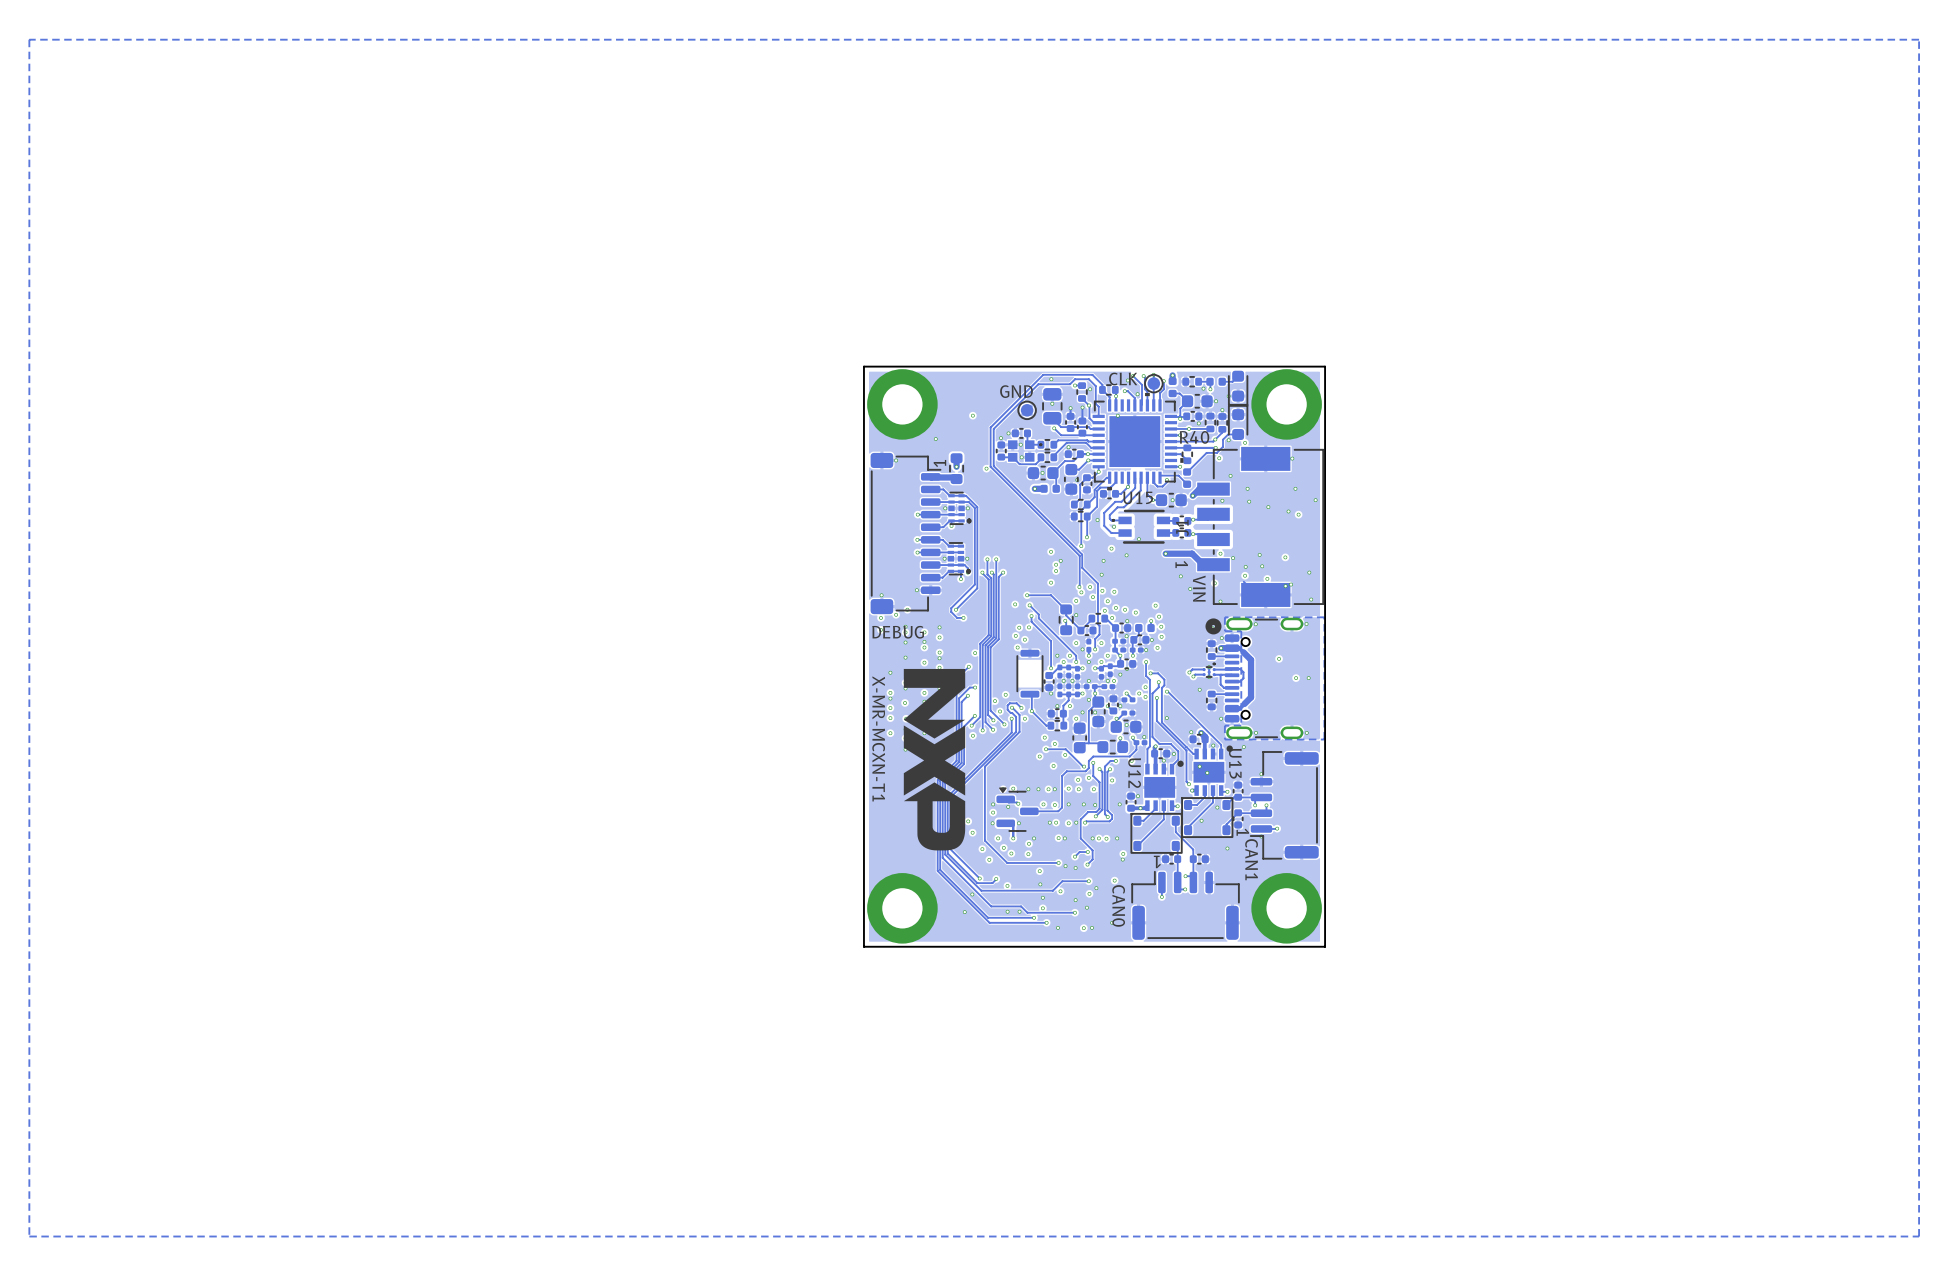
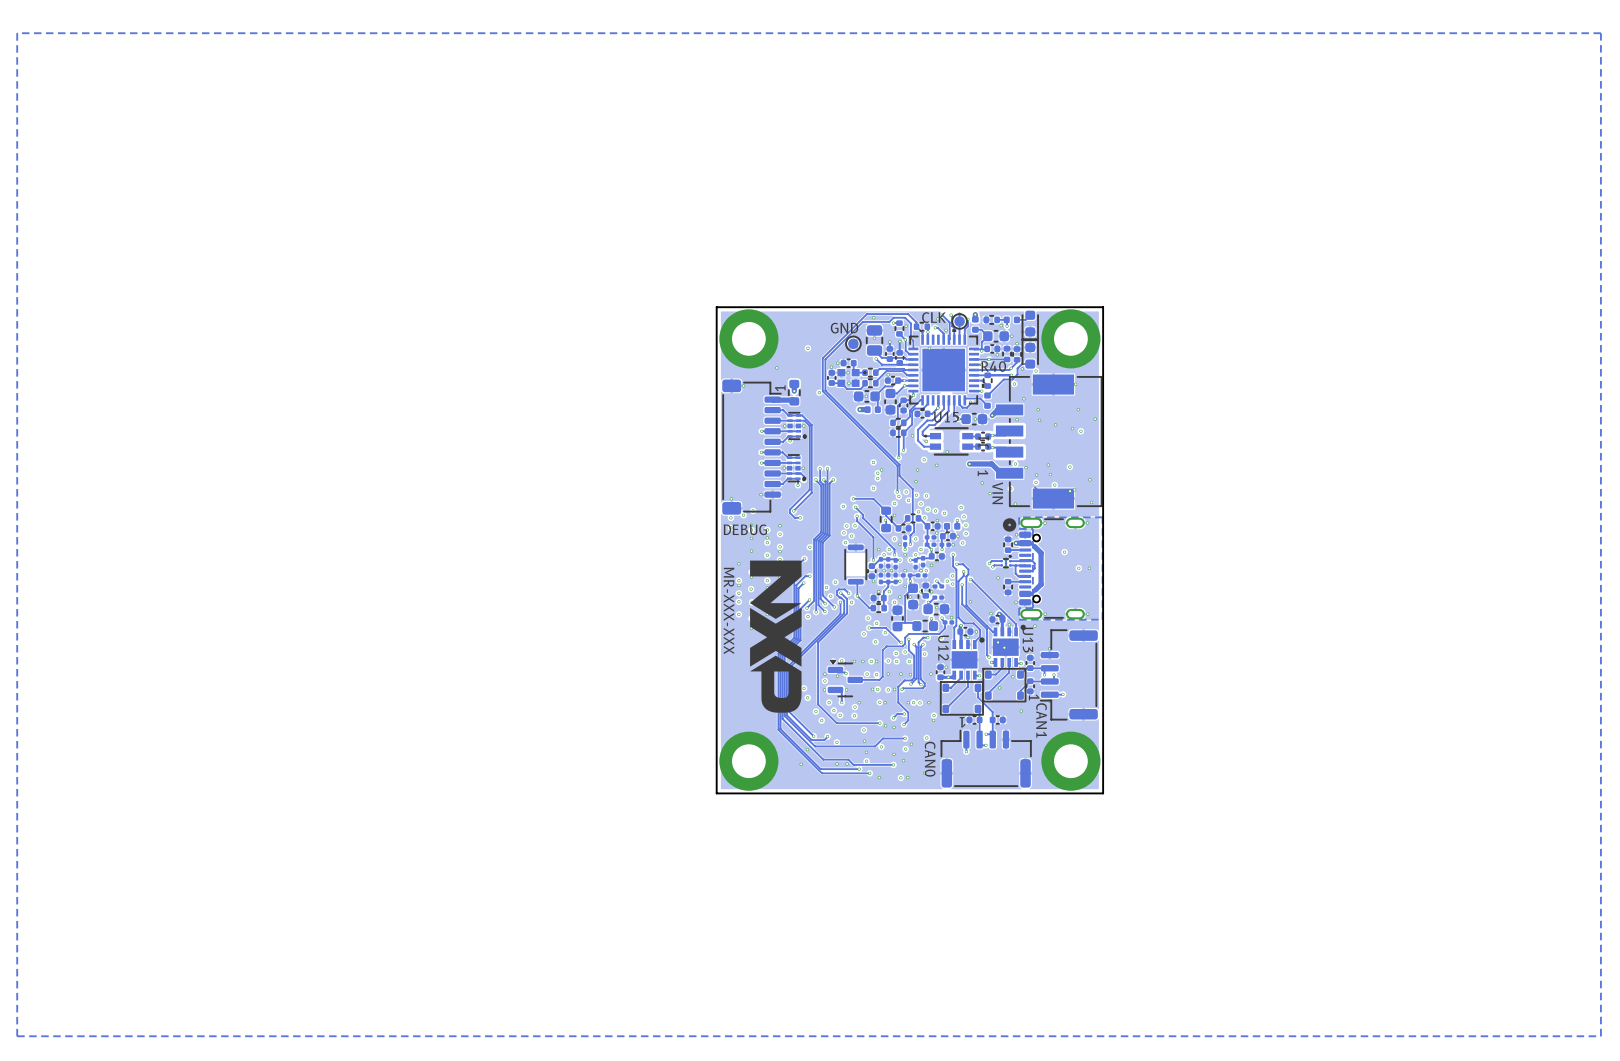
text: X-MR-MCXN-T1 (878, 738) -> MR-XXX-XXX (729, 610)

